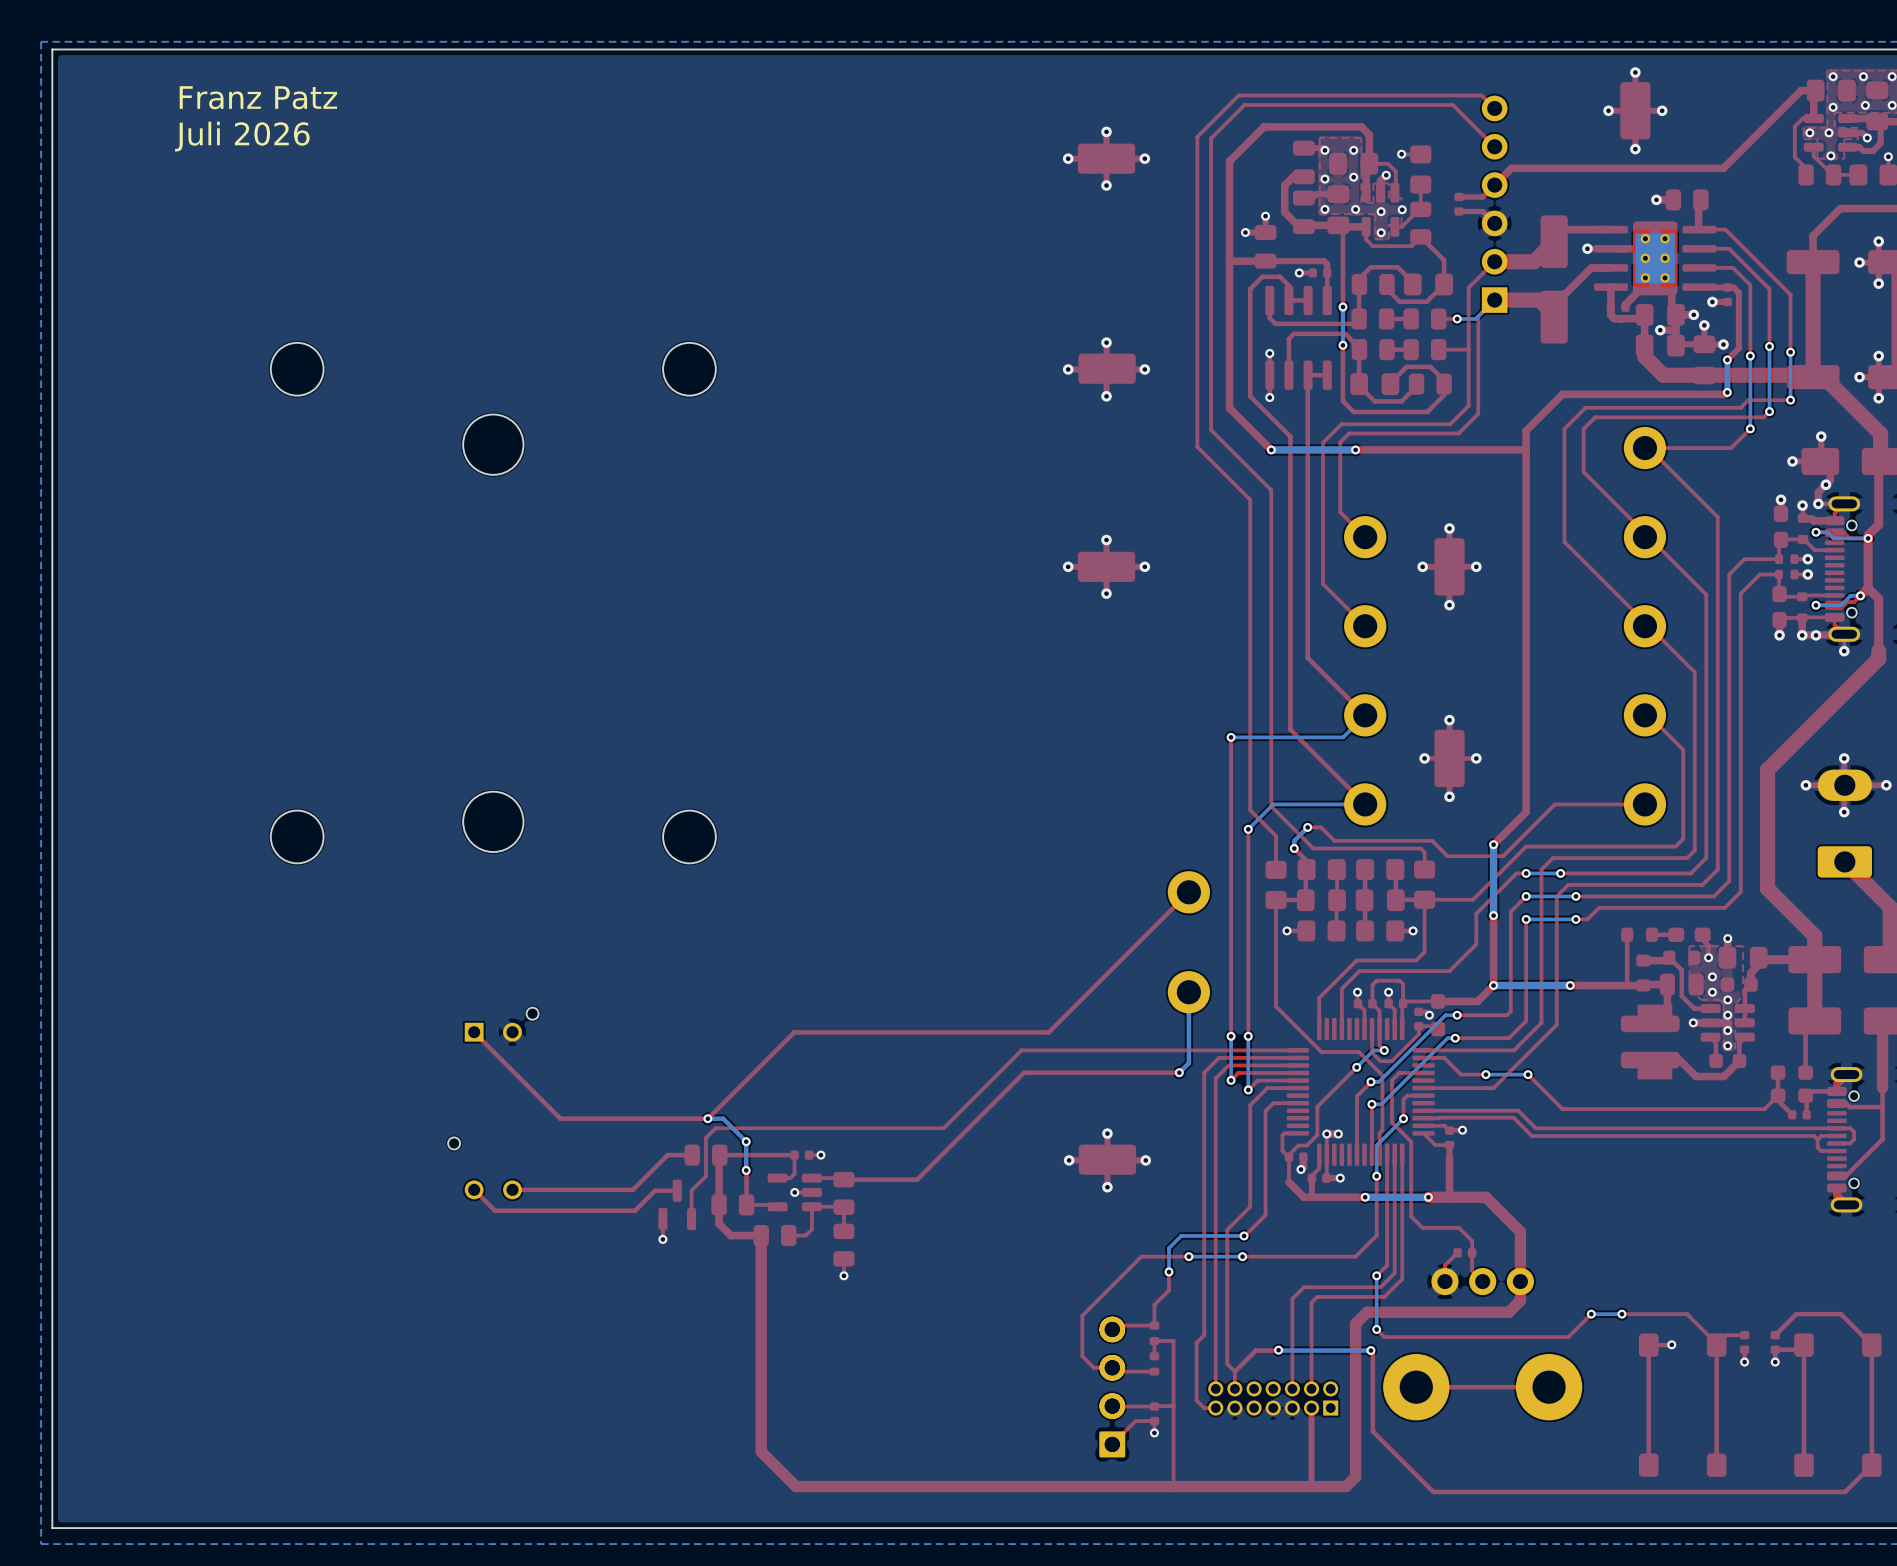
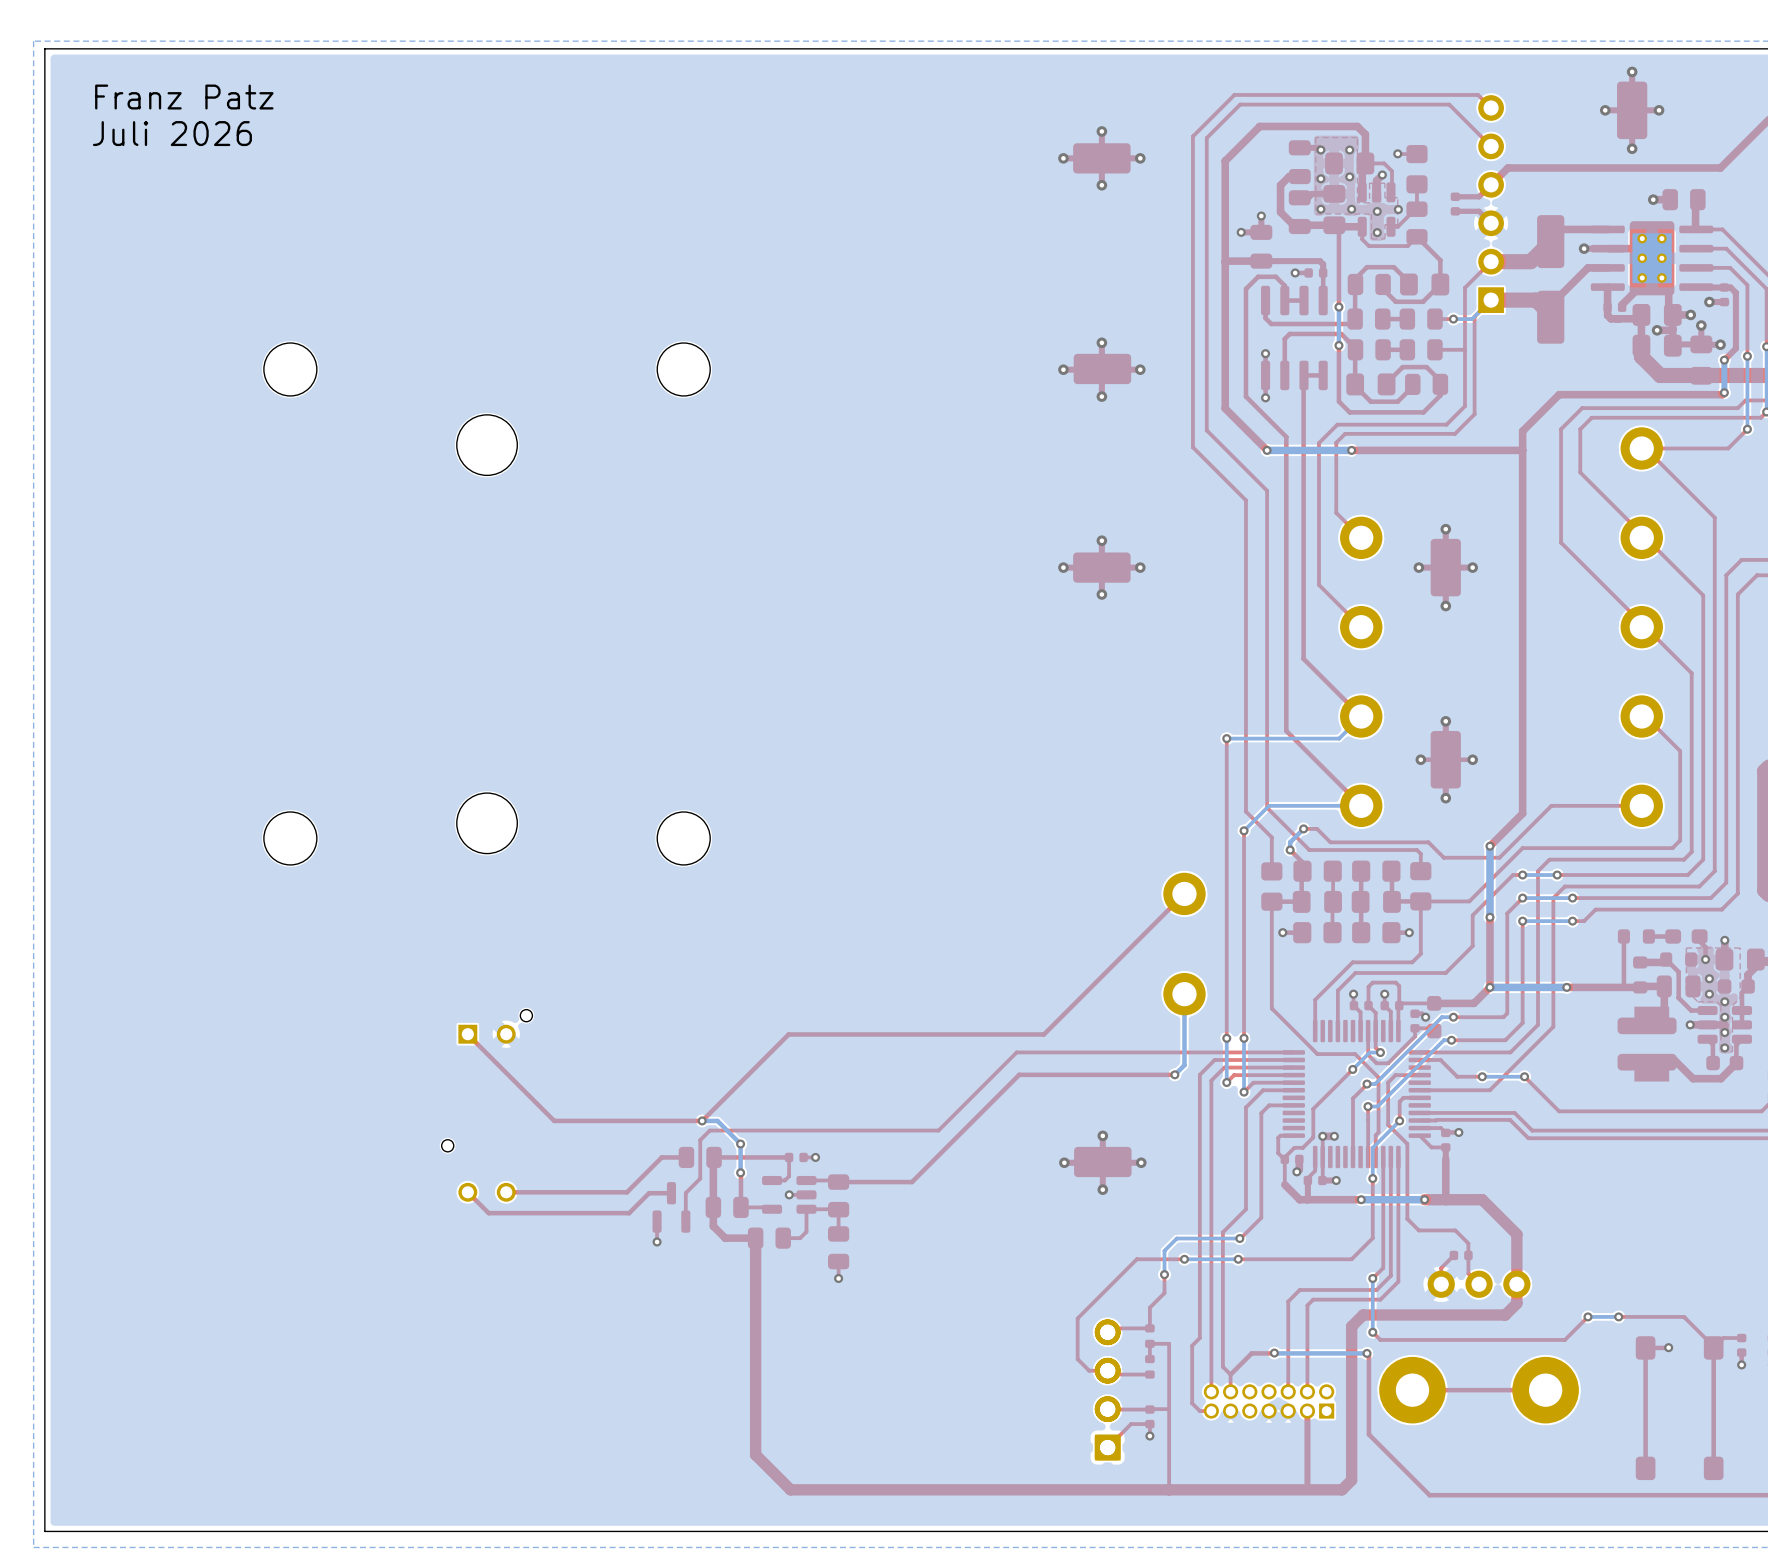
text position: Franz Patz (258, 97) -> Franz Patz (184, 97)
text position: Juli 2026 (242, 136) -> Juli 2026 (172, 133)

